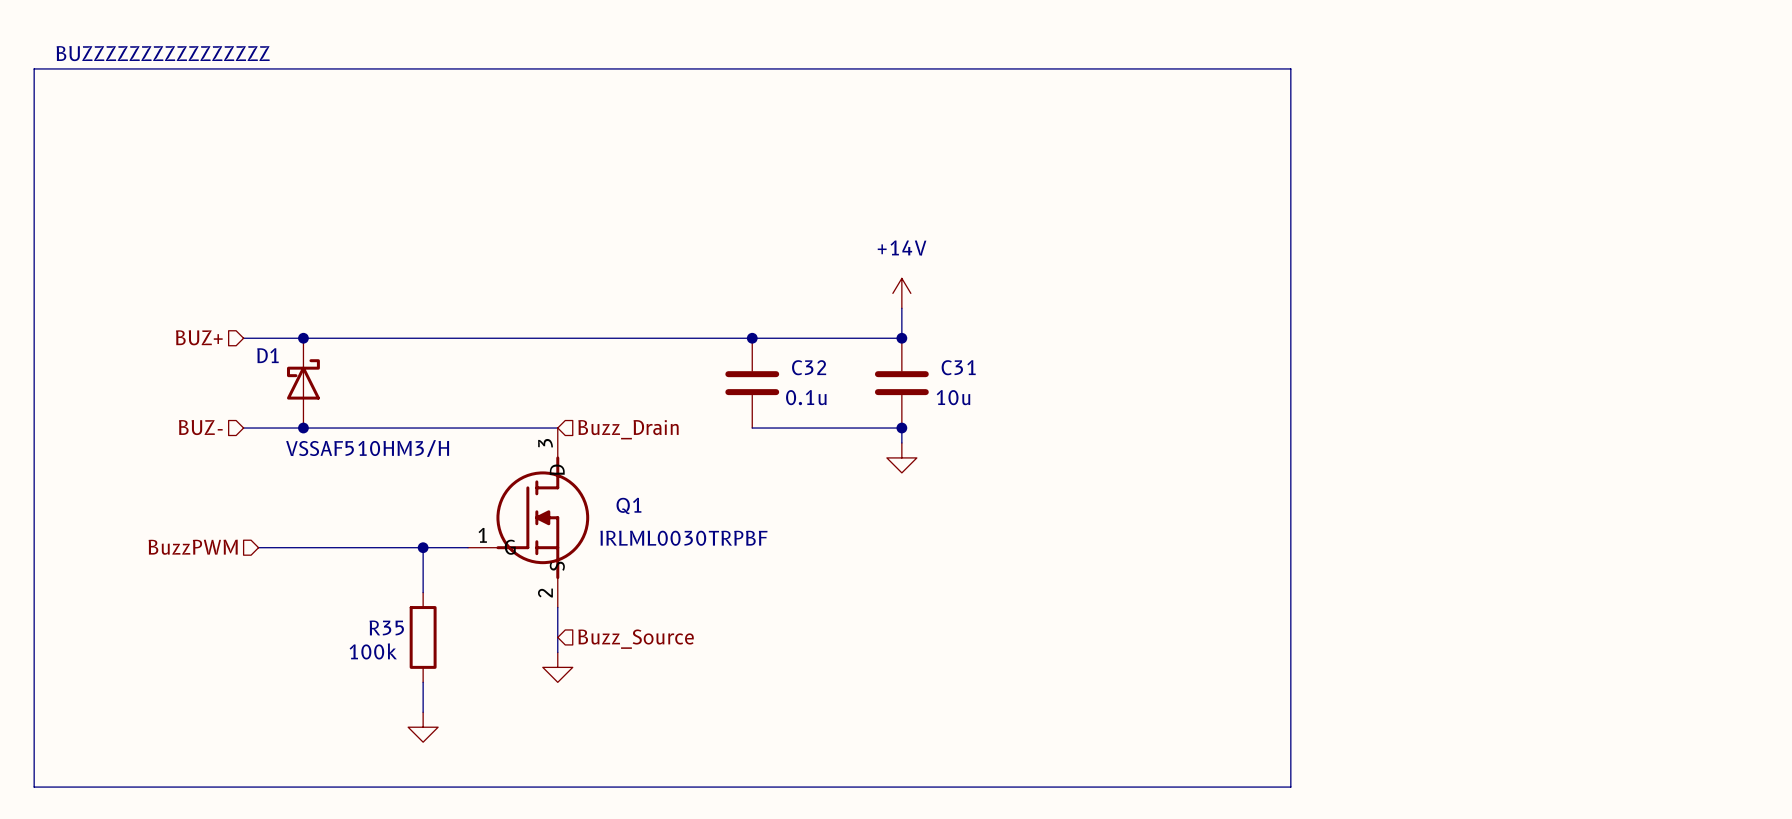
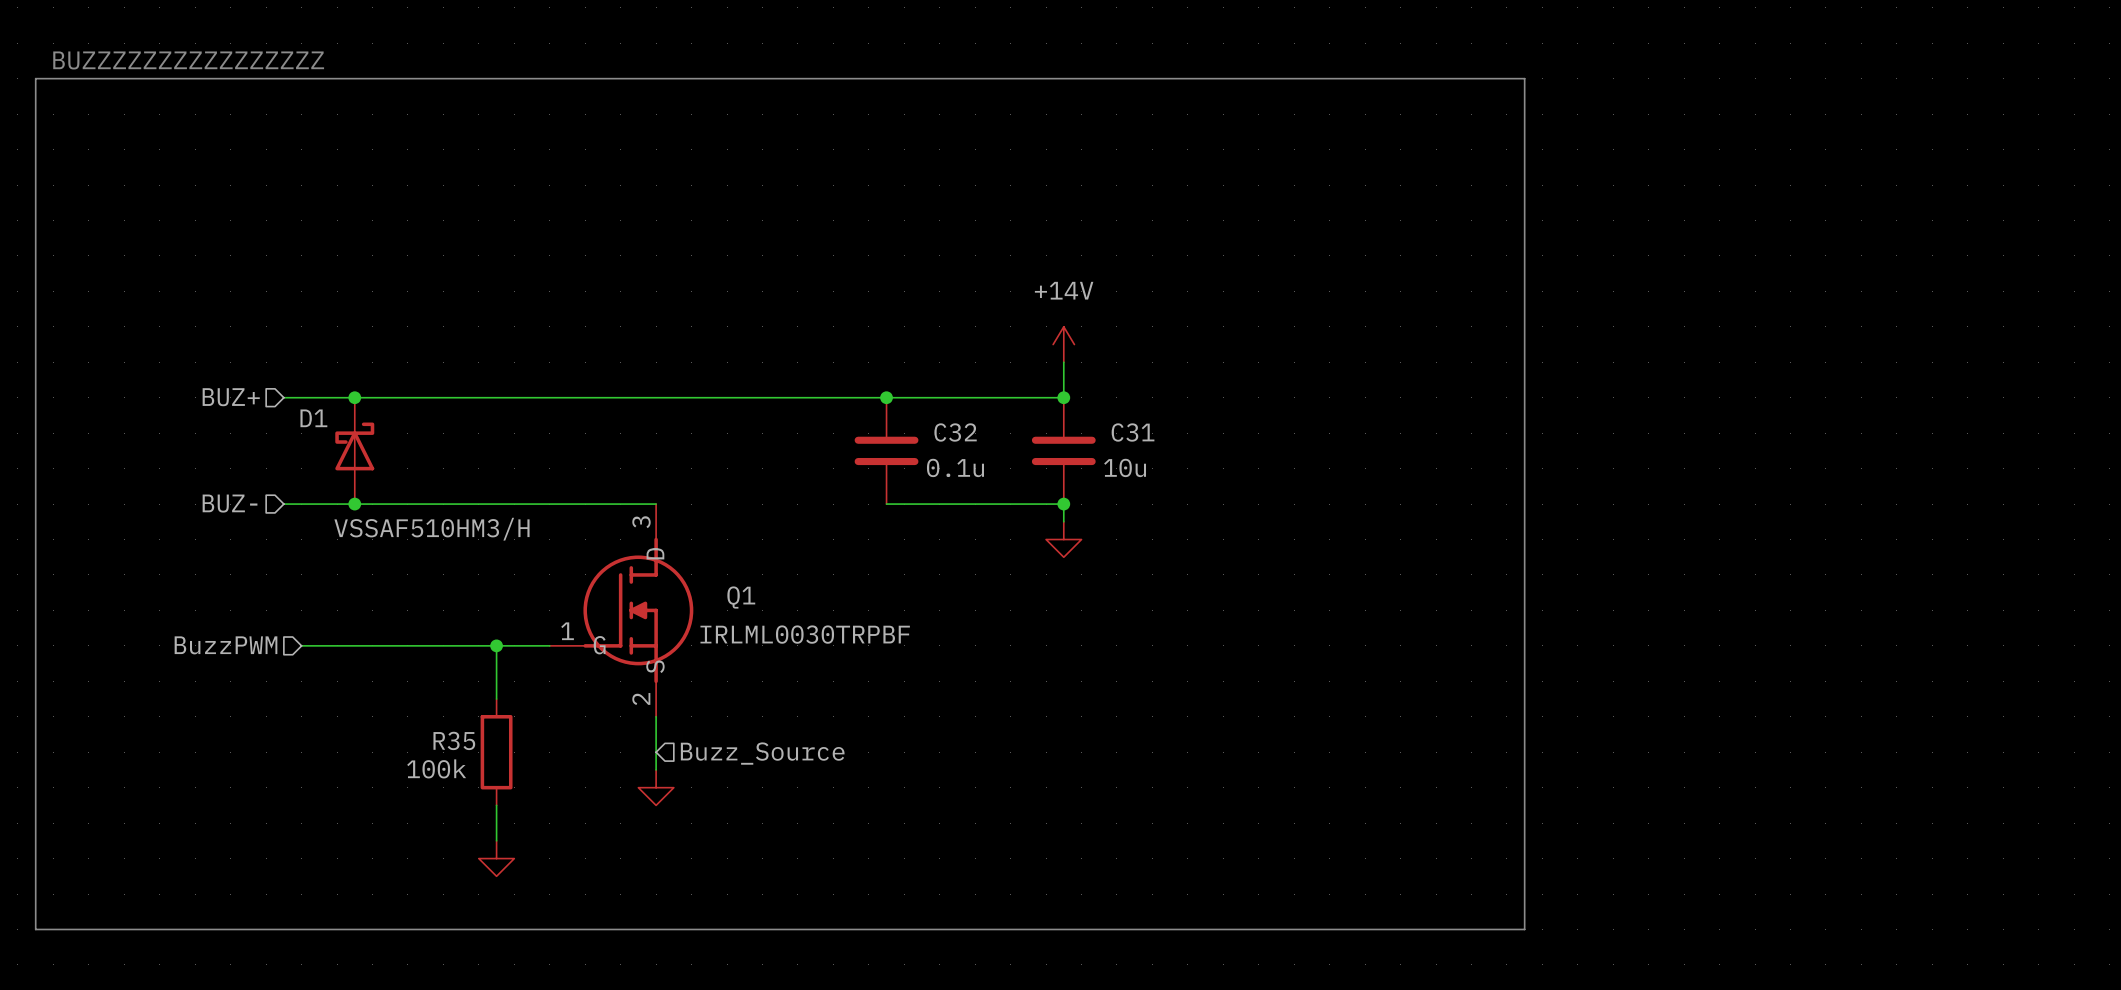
hierarchical label: Buzz_Drain (628, 429) -> none

